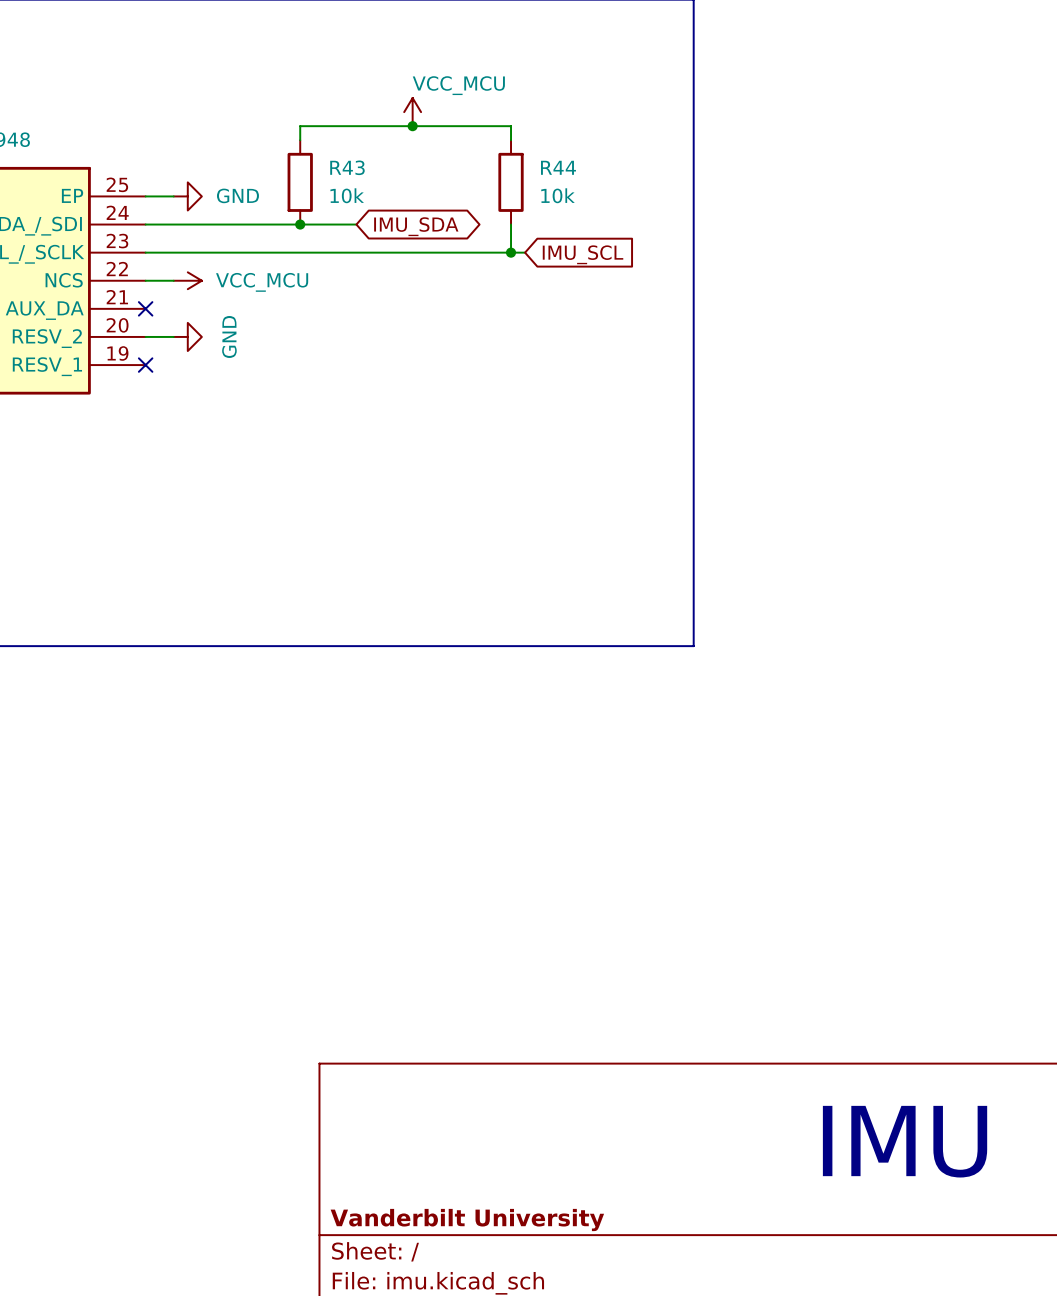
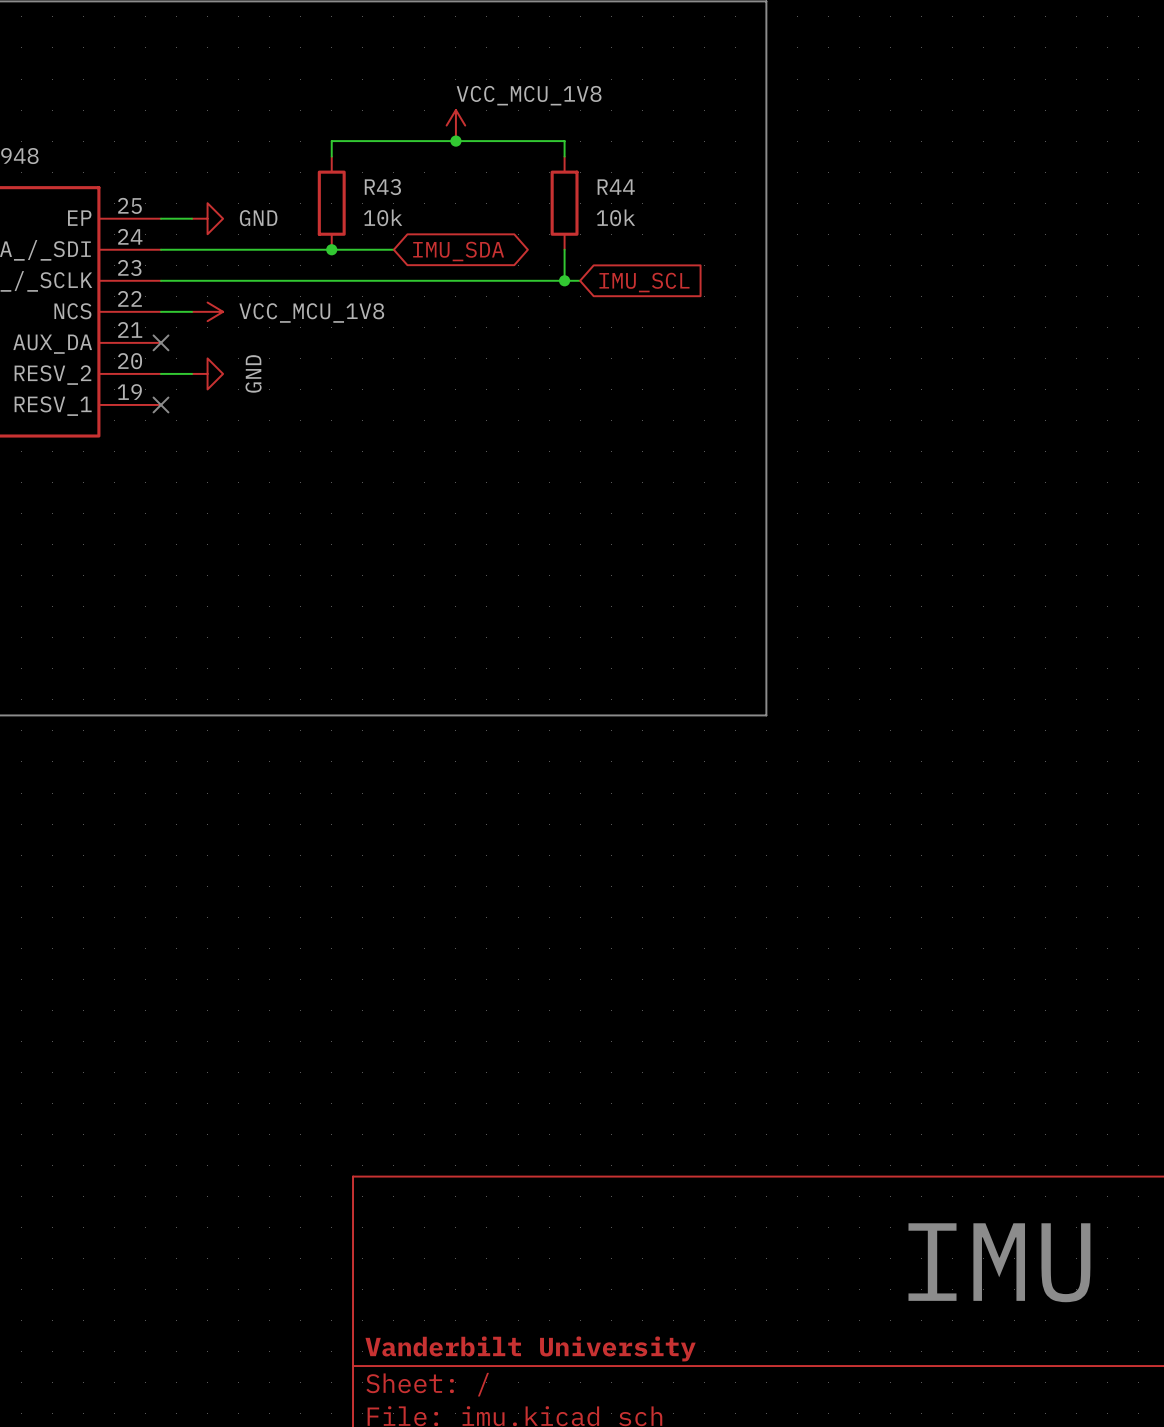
power symbol: VCC_MCU (412, 112) -> VCC_MCU_1V8 (455, 125)
power symbol: VCC_MCU (187, 280) -> VCC_MCU_1V8 (207, 311)

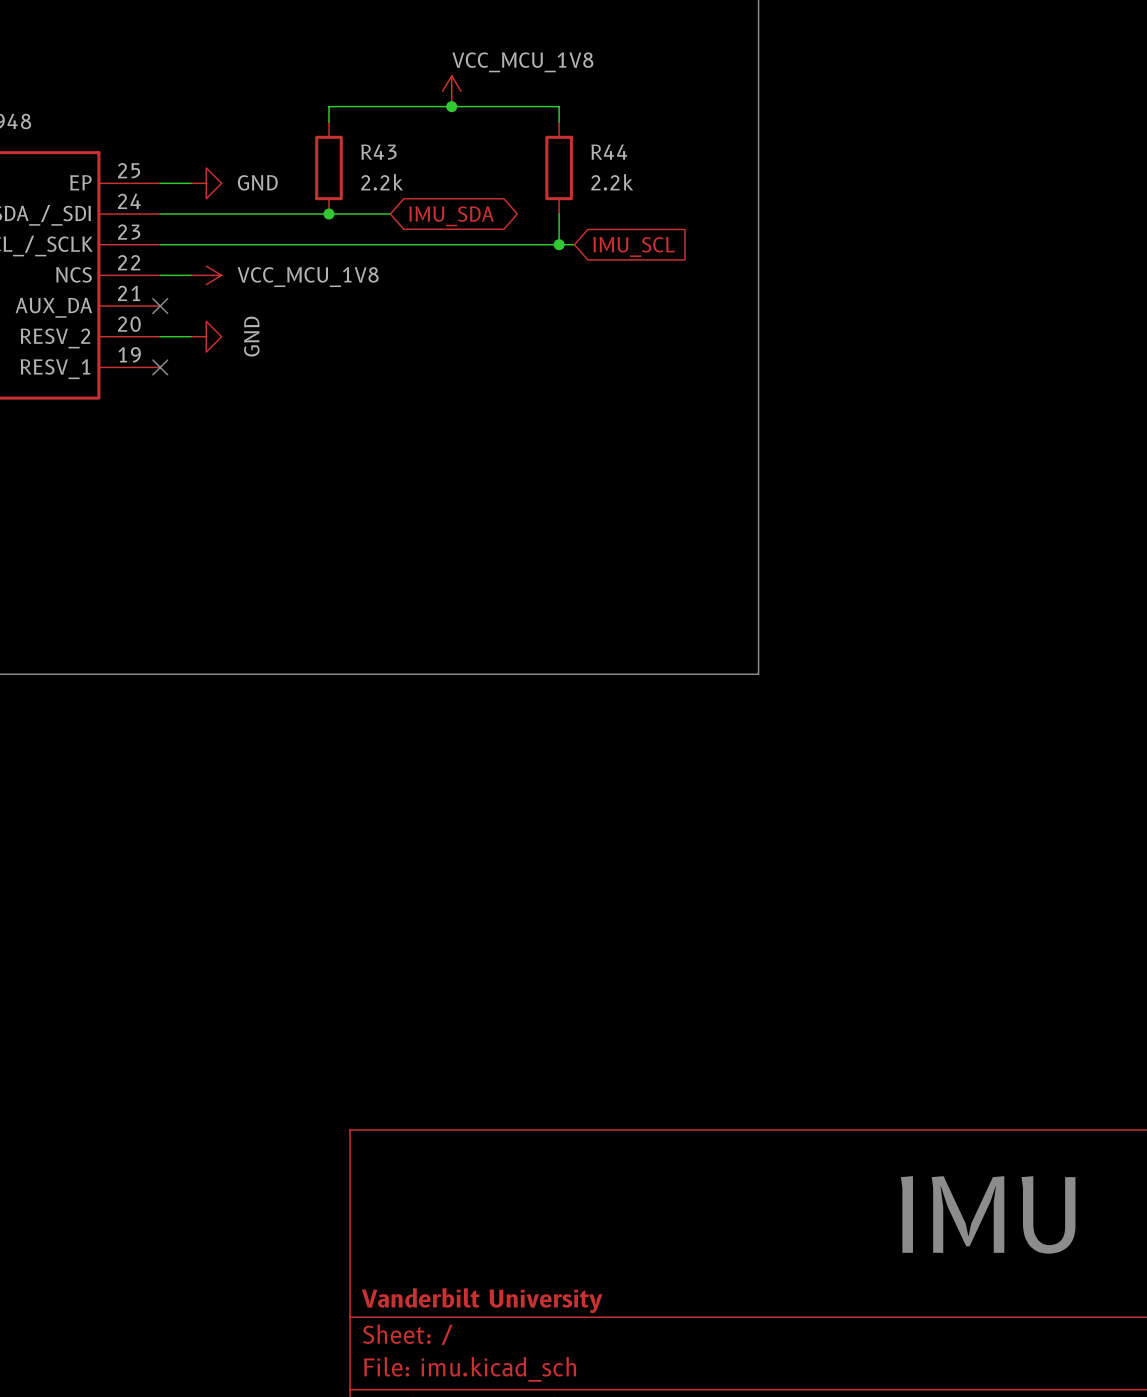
R43 value: 10k (383, 217) -> 2.2k (382, 182)
R44 value: 10k (615, 217) -> 2.2k (612, 182)

